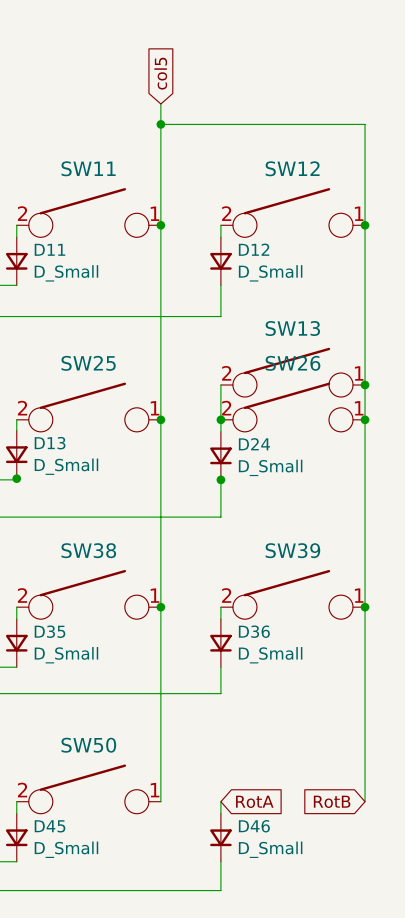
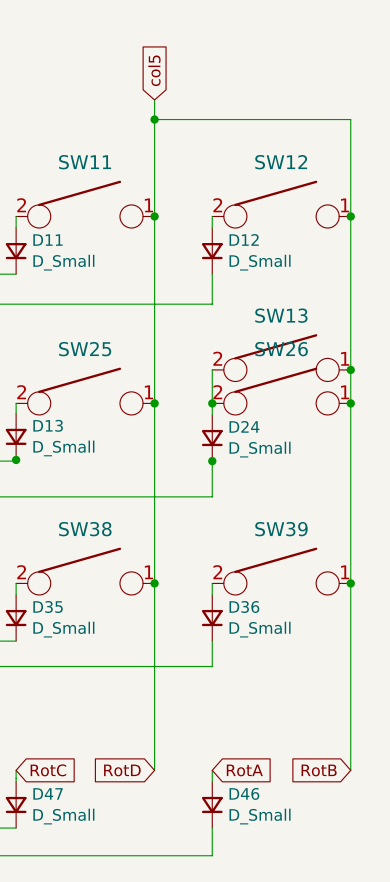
SW50: (88, 789) -> none
global label: none -> RotC (48, 770)
global label: none -> RotD (122, 770)
D45 name: D45 (50, 826) -> D47 (48, 793)

